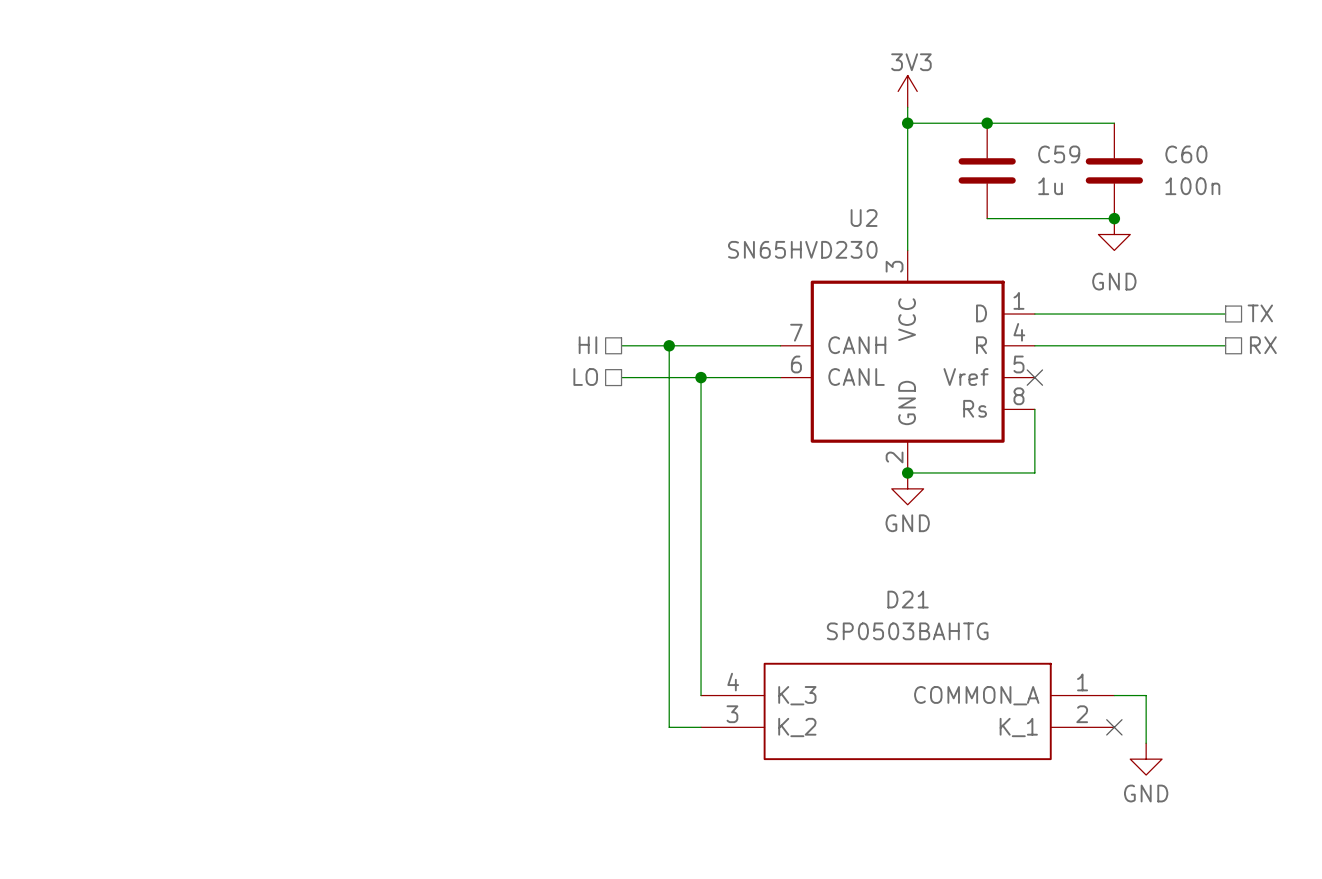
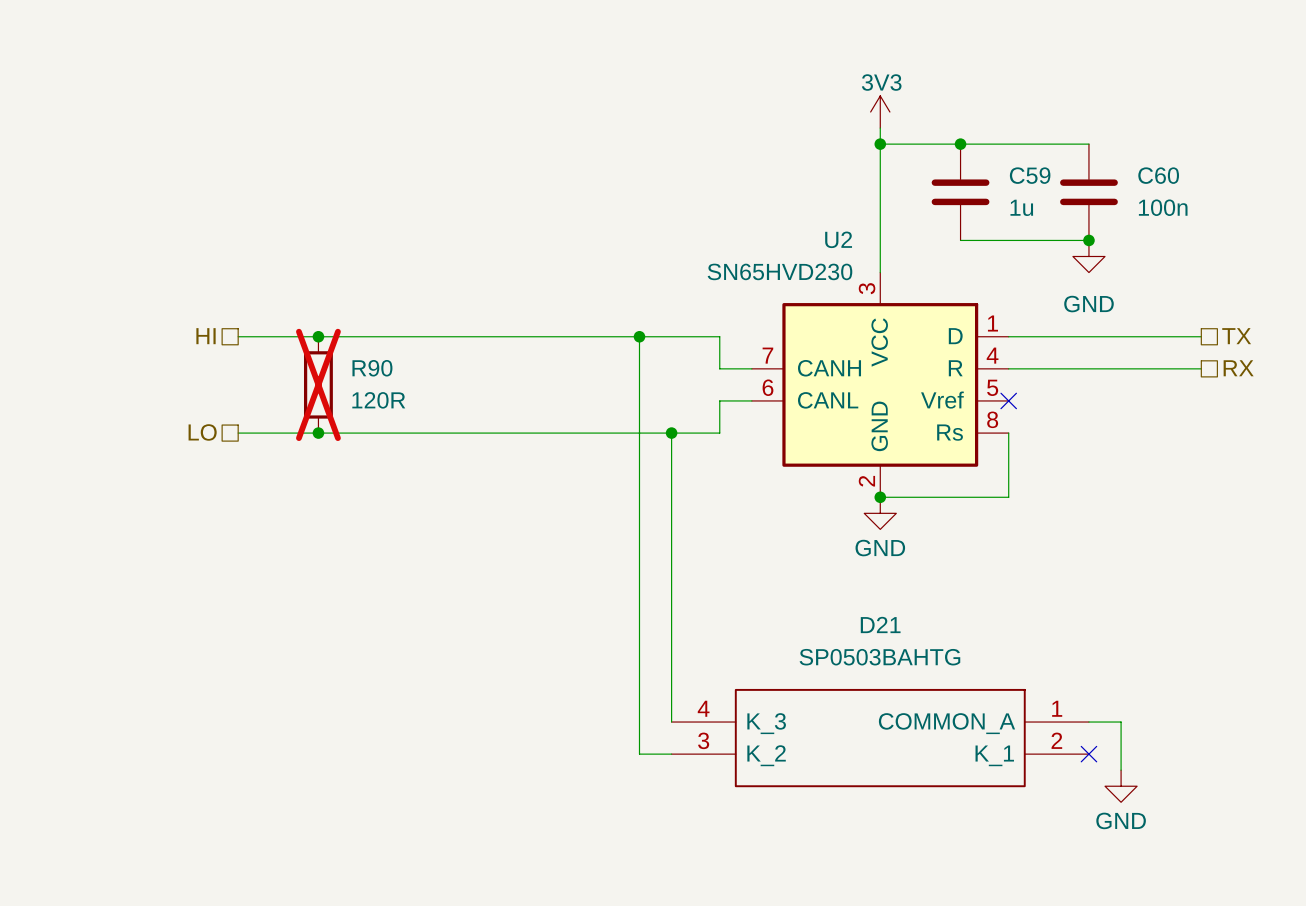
hierarchical label: none -> HI (206, 336)
junction: none -> (318, 336)
hierarchical label: HI (587, 345) -> none
wire: (621, 345) (748, 345) -> (238, 336) (719, 336) (719, 368)
junction position: (669, 345) -> (639, 336)
R90: none -> 120R (318, 384)
hierarchical label: LO (585, 377) -> none
wire: (621, 377) (748, 377) -> (238, 433) (719, 433) (719, 400)
wire: (701, 377) (701, 409) -> (639, 336) (639, 368)
junction position: (701, 377) -> (671, 433)
hierarchical label: none -> LO (202, 432)
junction: none -> (318, 433)

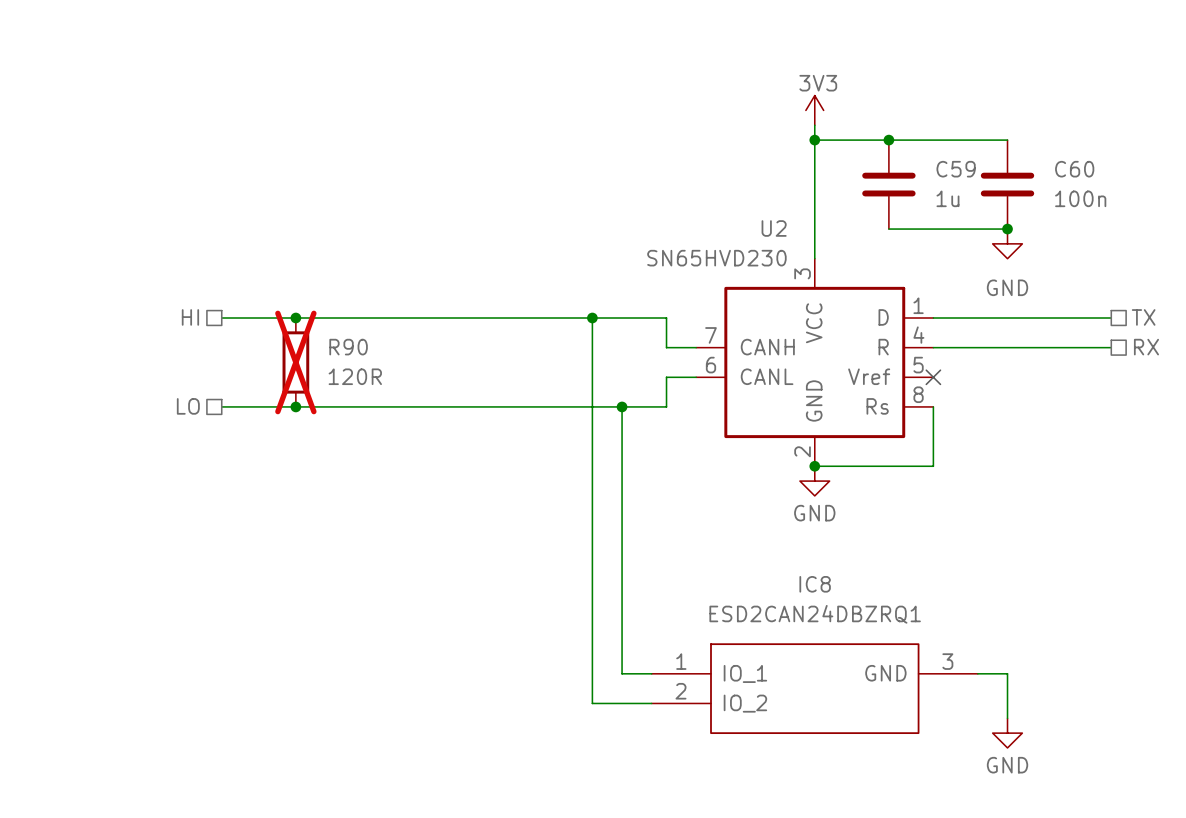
wire: (1088, 722) (1121, 722) (1121, 770) -> (977, 673) (1007, 673) (1007, 718)
D21: SP0503BAHTG (880, 738) -> none
IC8: none -> ESD2CAN24DBZRQ1 (814, 688)
no-connect mark: (1088, 754) -> none
power symbol position: GND (1121, 786) -> GND (1007, 733)

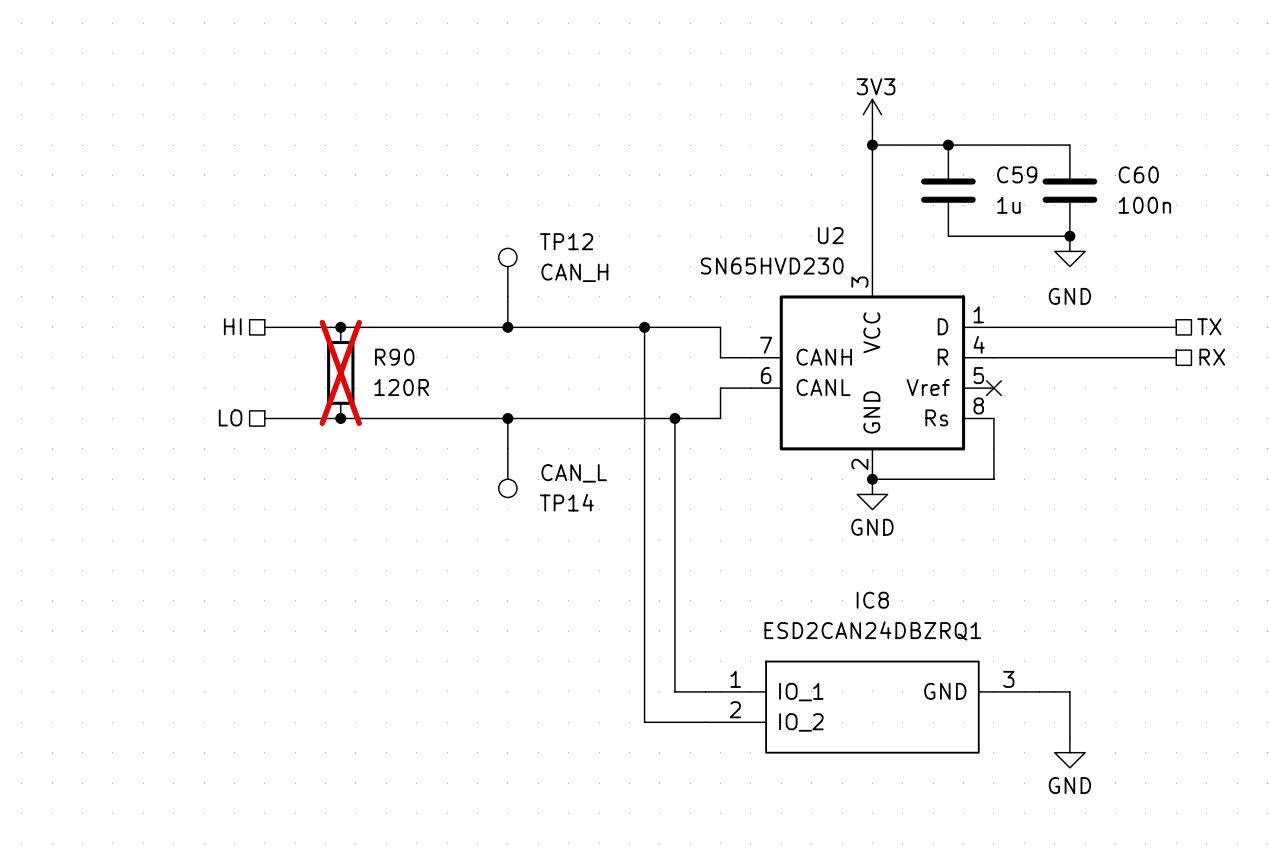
TP12: none -> CAN_H (507, 272)
wire: none -> (507, 296) (507, 327)
junction: none -> (507, 327)
wire: none -> (507, 418) (507, 448)
junction: none -> (507, 418)
TP14: none -> CAN_L (507, 473)

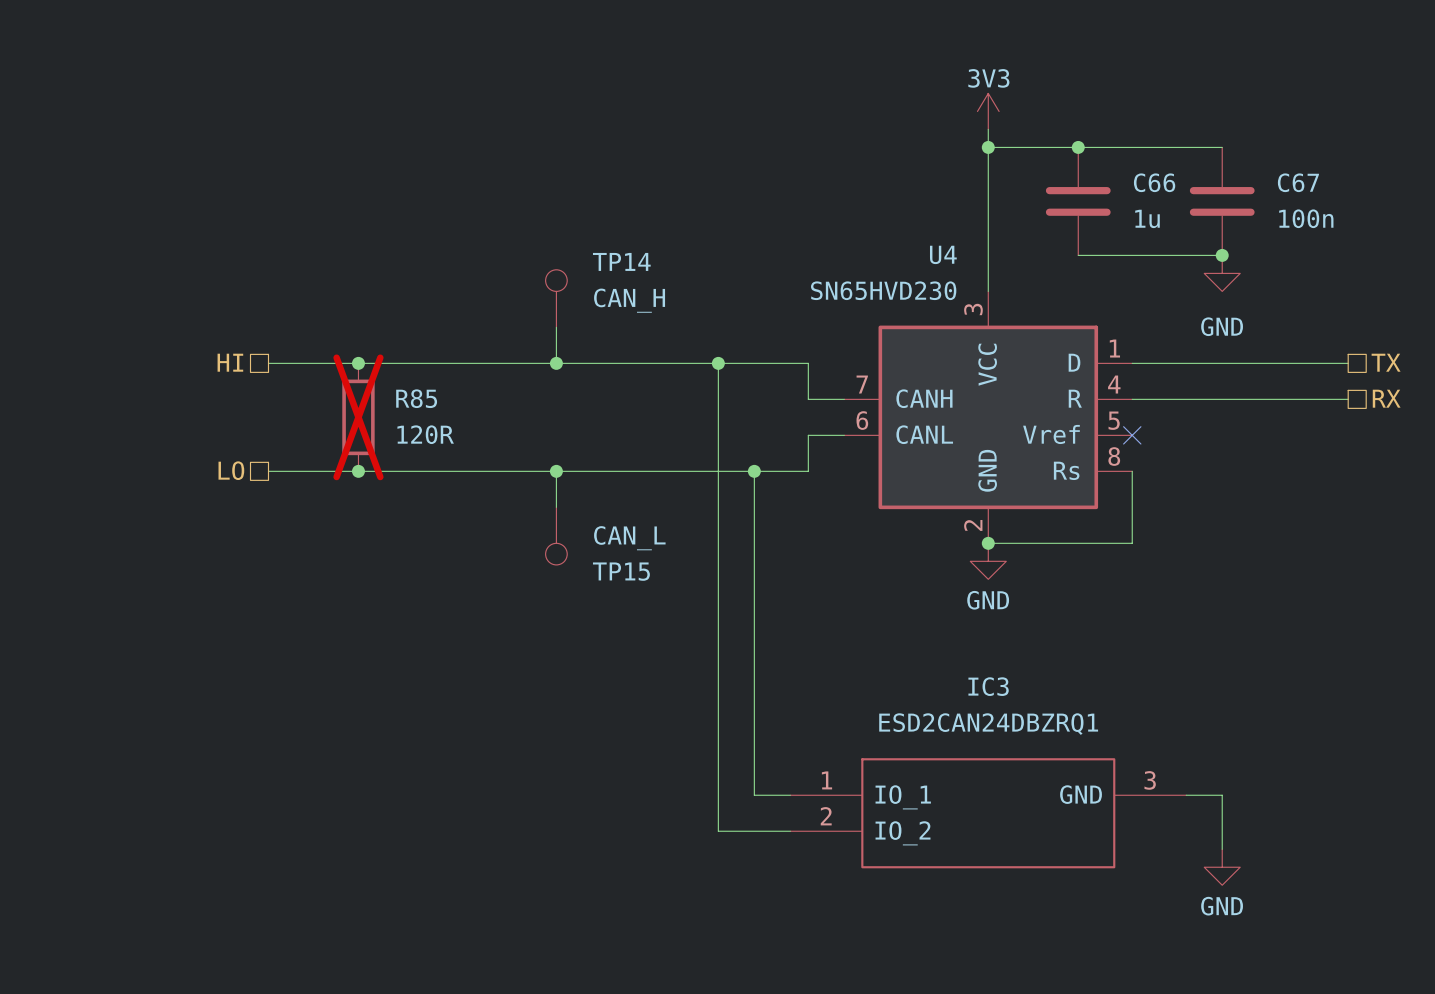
C59 name: C59 (1017, 174) -> C66 (1154, 182)
C60 name: C60 (1138, 174) -> C67 (1298, 182)
U2 name: U2 (830, 235) -> U4 (943, 254)
TP12 name: TP12 (566, 241) -> TP14 (621, 261)
R90 name: R90 (394, 357) -> R85 (416, 398)
TP14 name: TP14 (566, 502) -> TP15 (621, 571)
IC8 name: IC8 (872, 600) -> IC3 (988, 686)

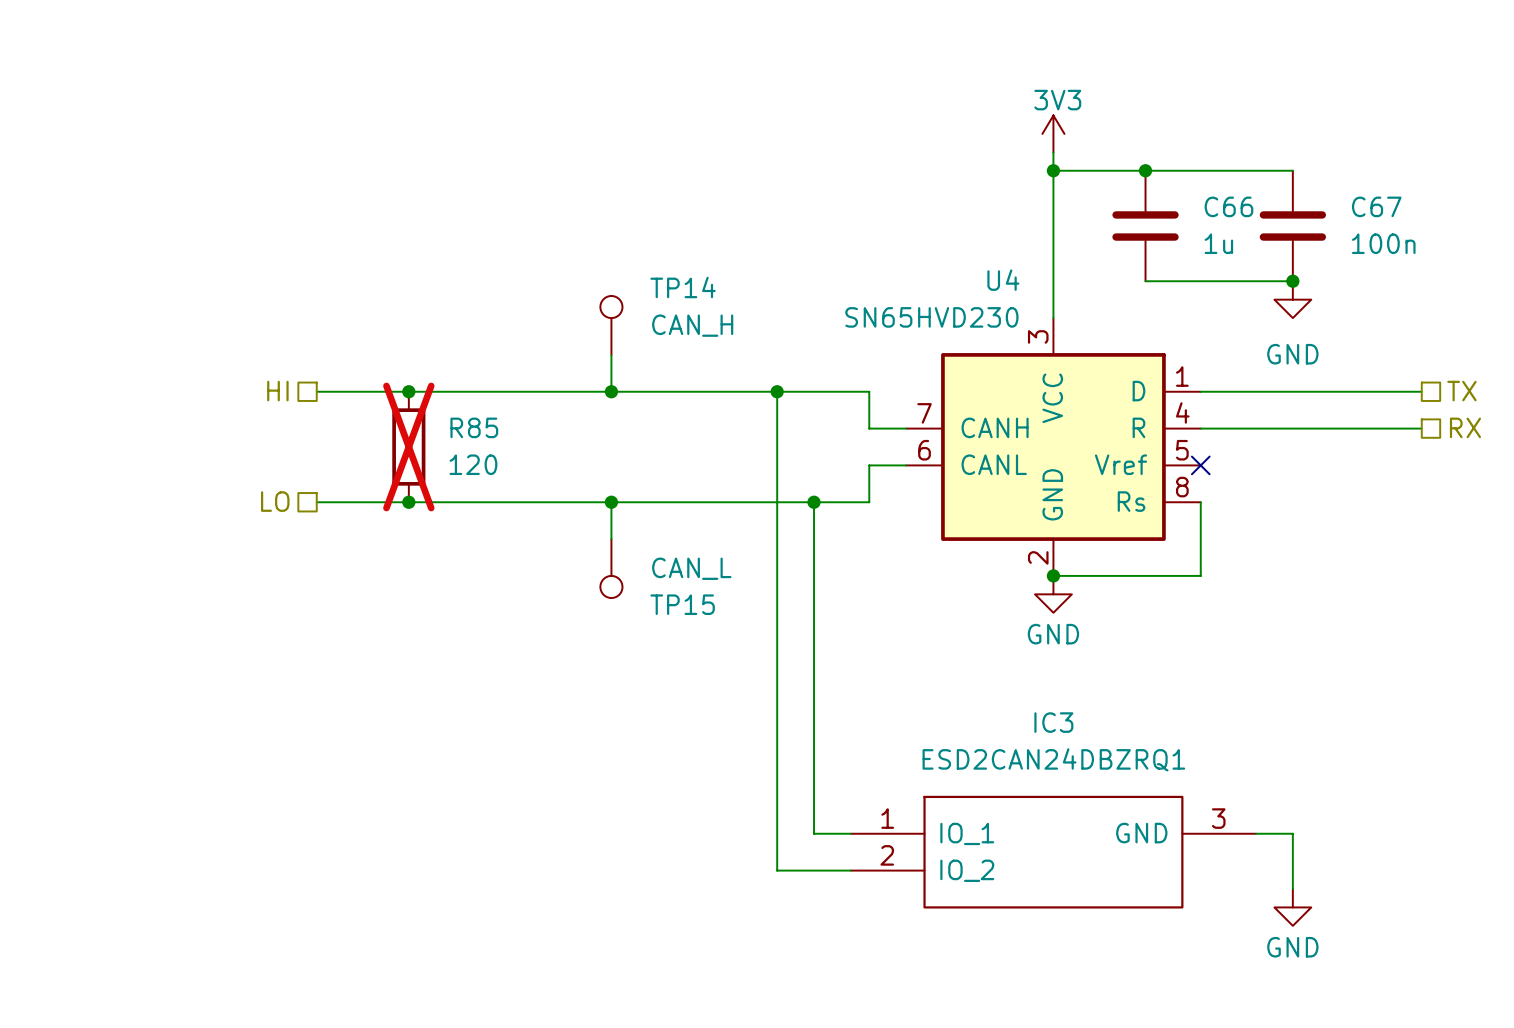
R85 value: 120R (425, 434) -> 120 (473, 464)

